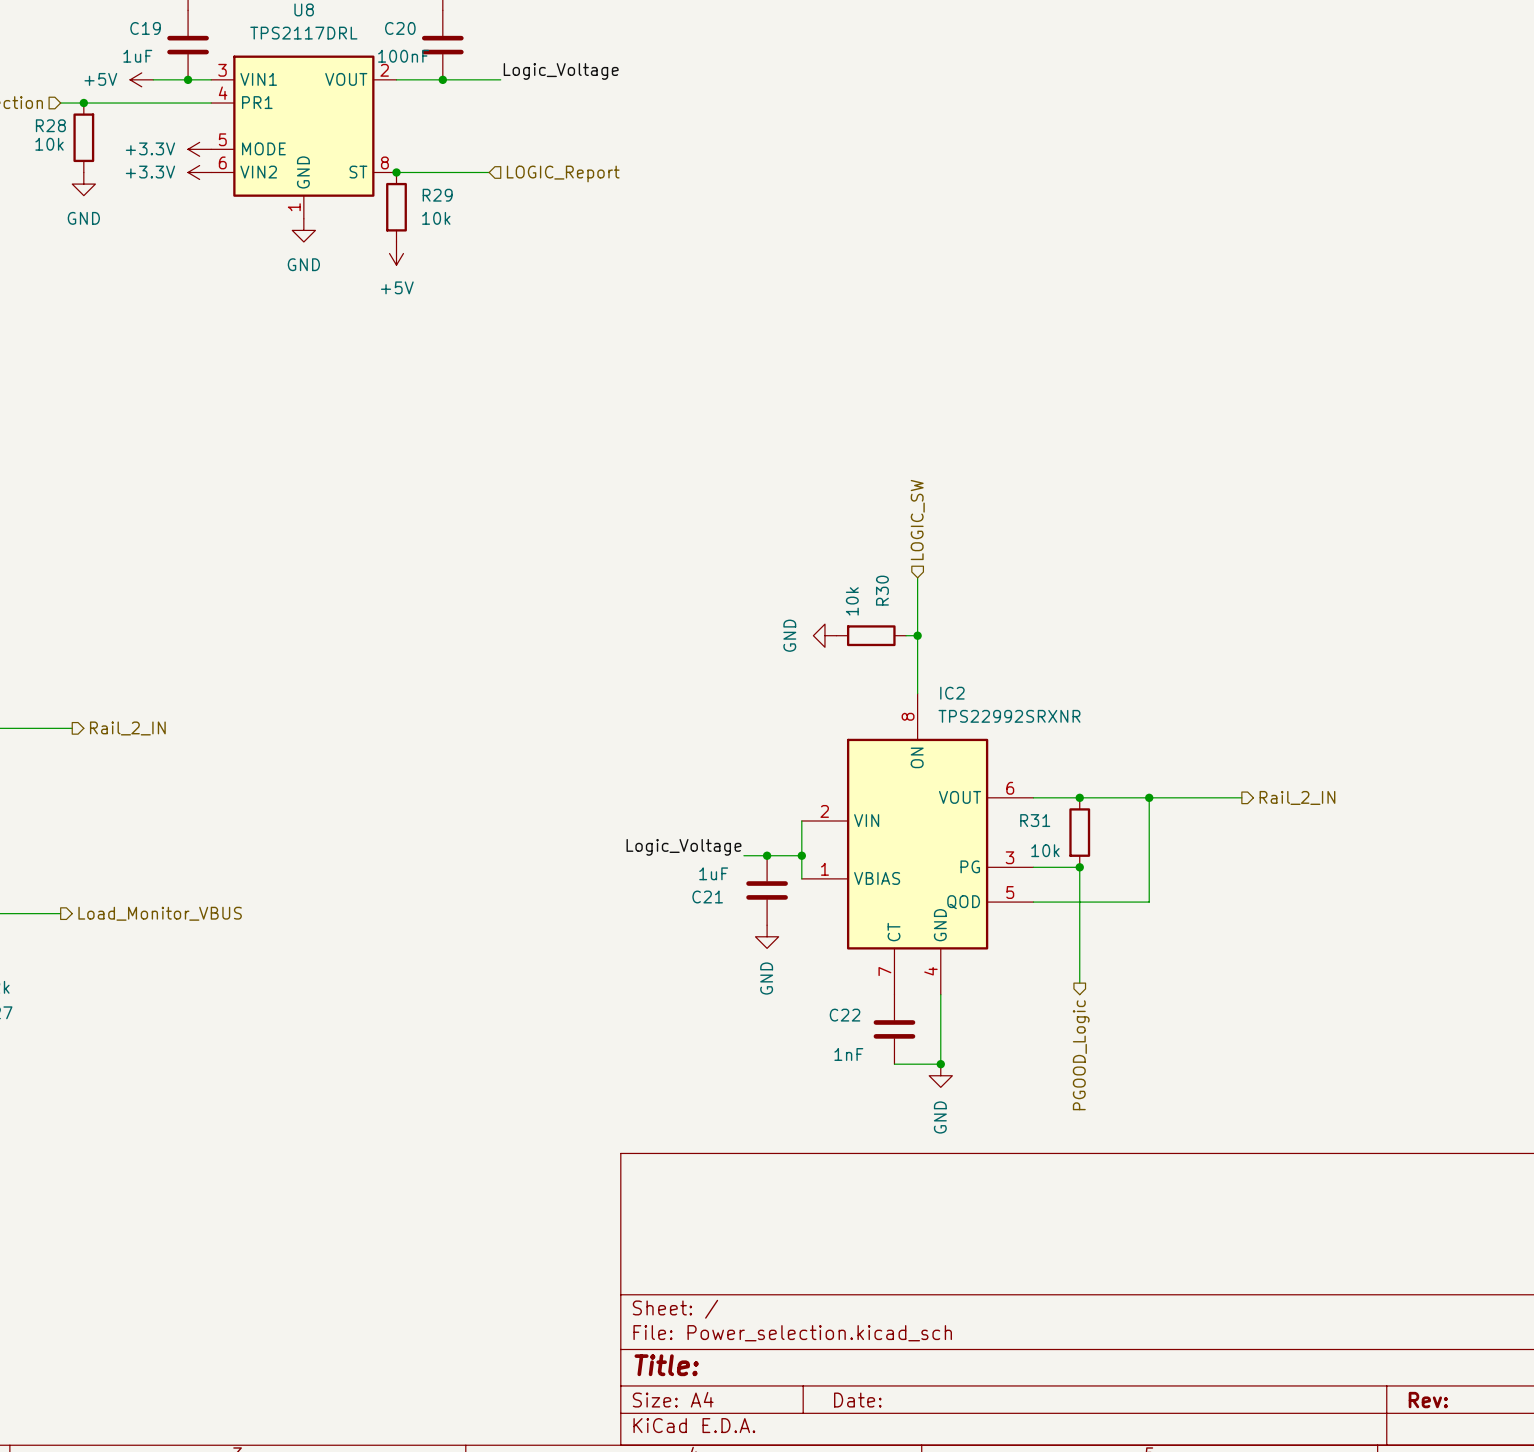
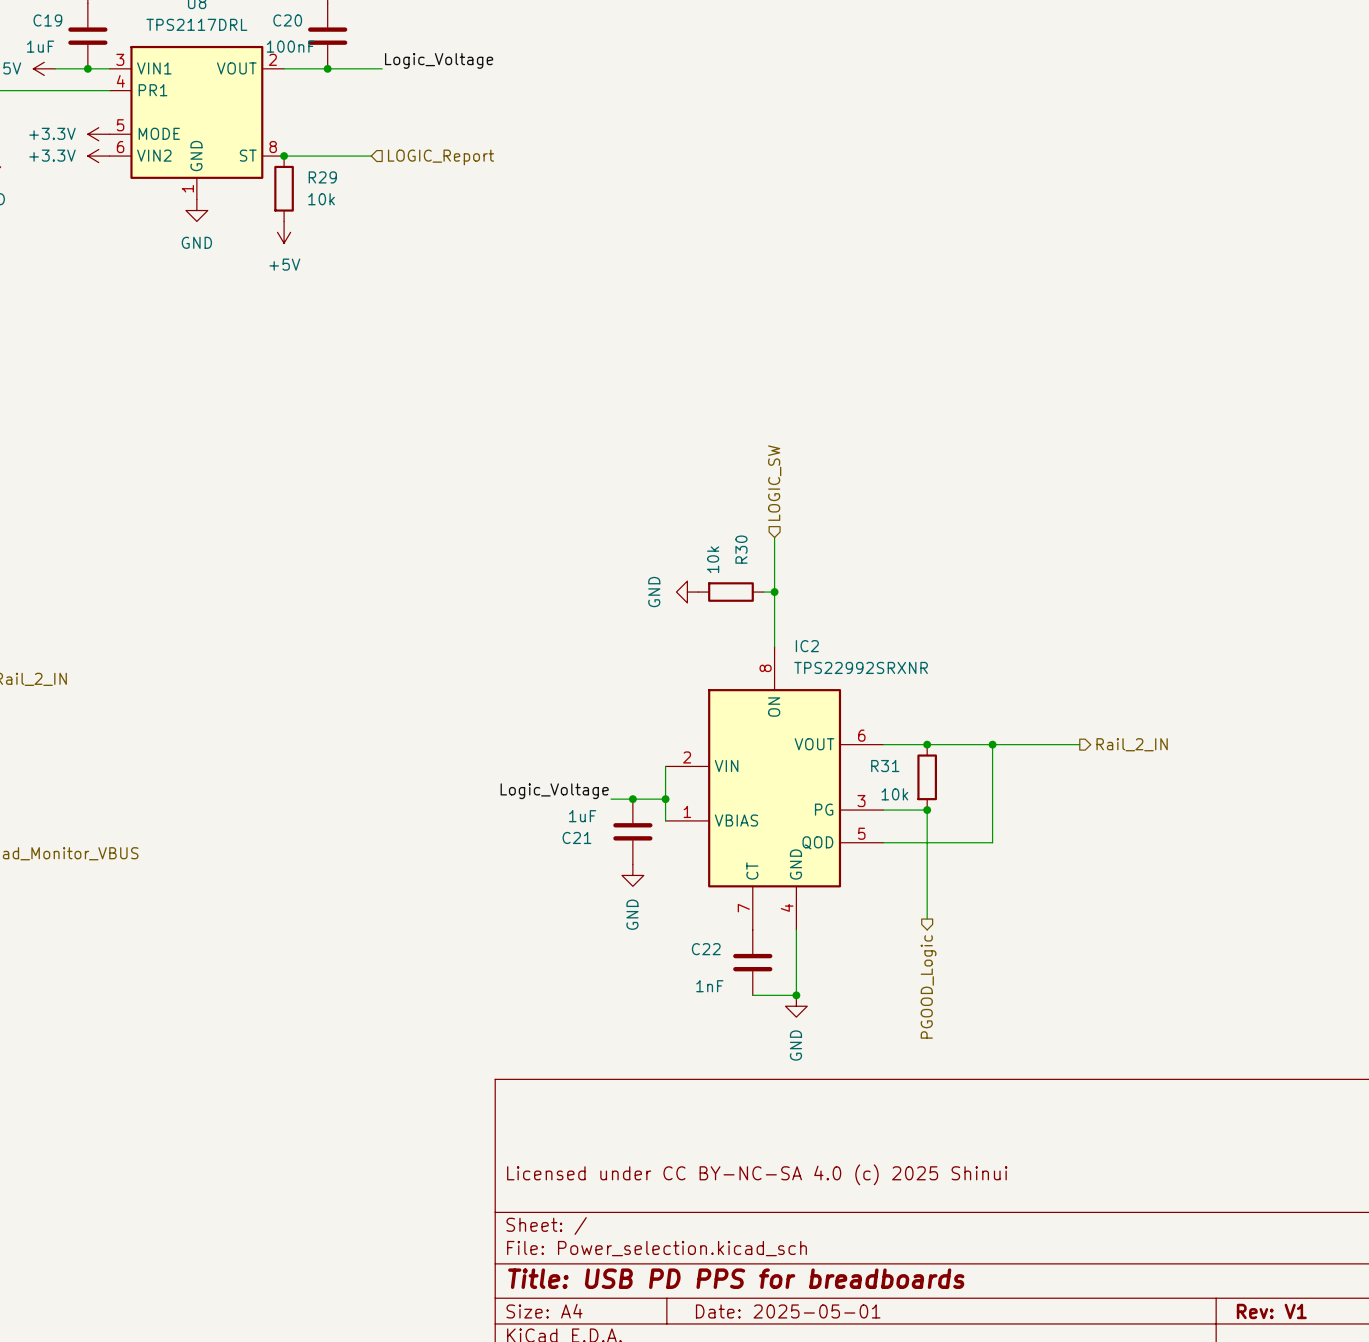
title block: none -> Licensed under CC BY-NC-SA 4.0 (c) 2025 Shinui (757, 1174)
title block: Title: (666, 1365) -> Title: USB PD PPS for breadboards (736, 1278)
title block: Date: (857, 1400) -> Date: 2025-05-01 (788, 1311)
title block: Rev: (1428, 1400) -> Rev: V1 (1271, 1311)

